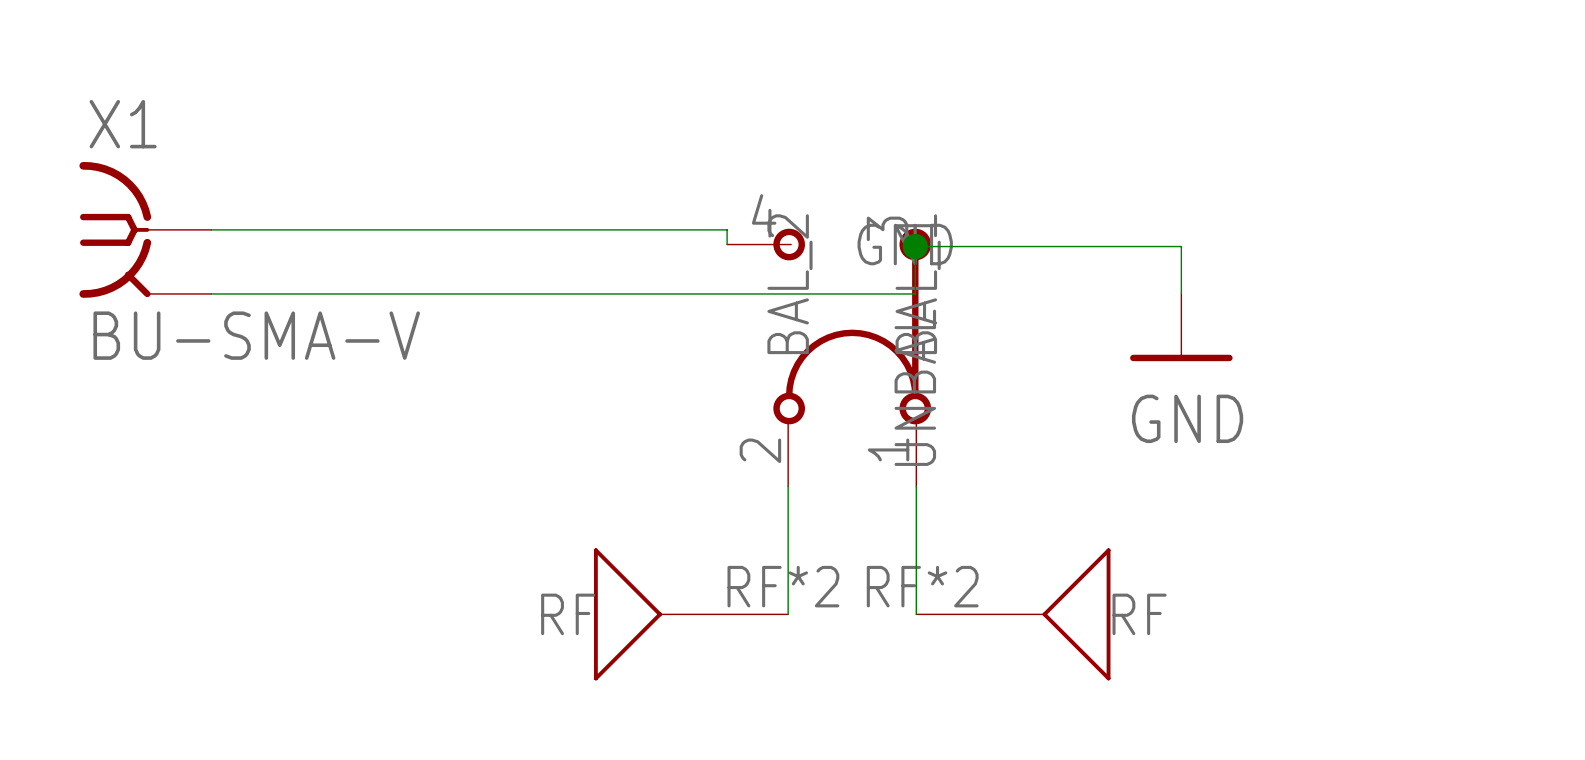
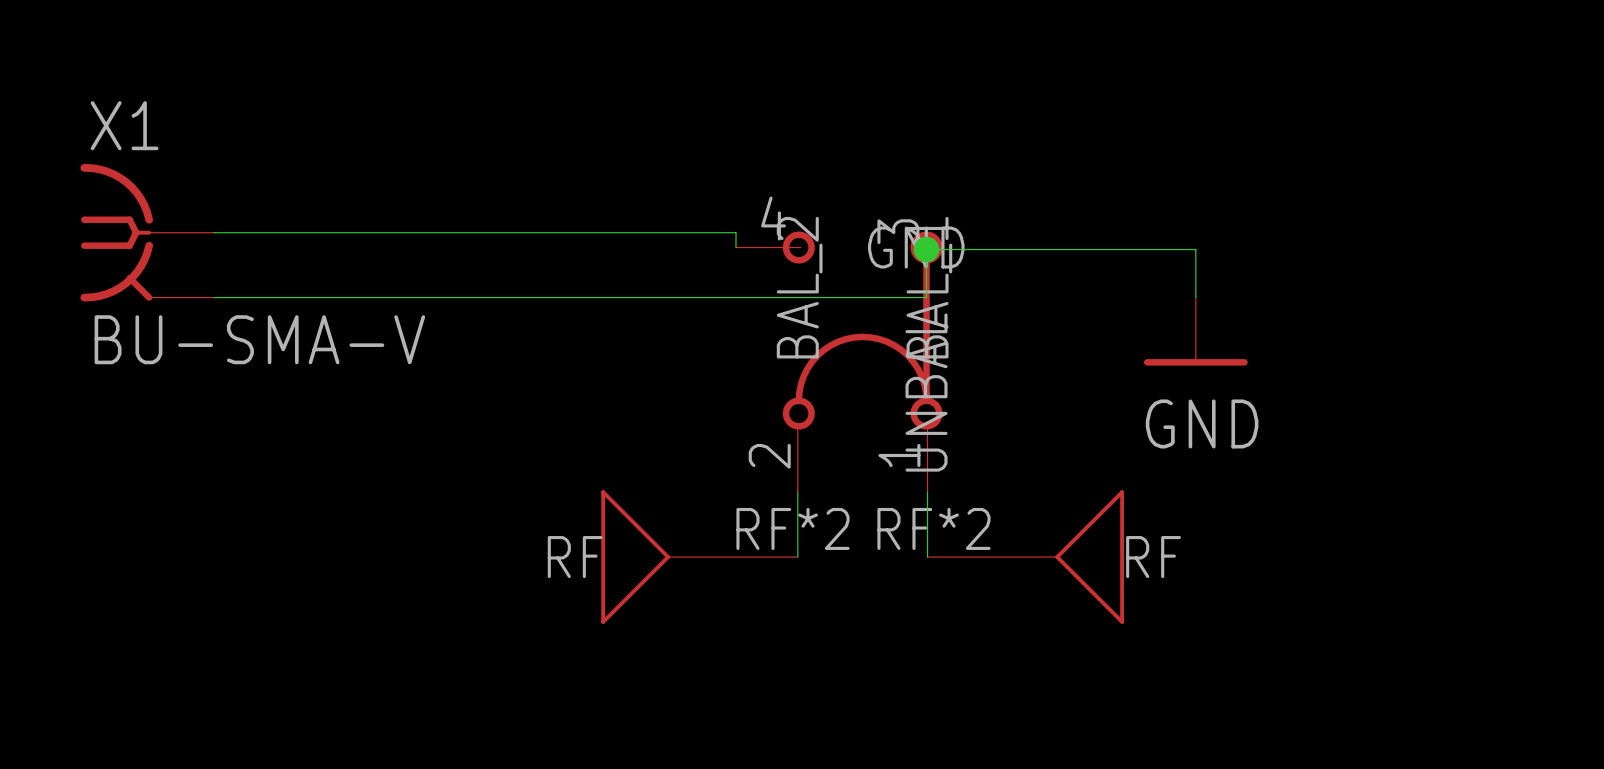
wire: (788, 550) (788, 614) -> none
wire: (916, 550) (916, 614) -> none
part position: (691, 614) -> (699, 557)
part position: (1013, 614) -> (1025, 557)

